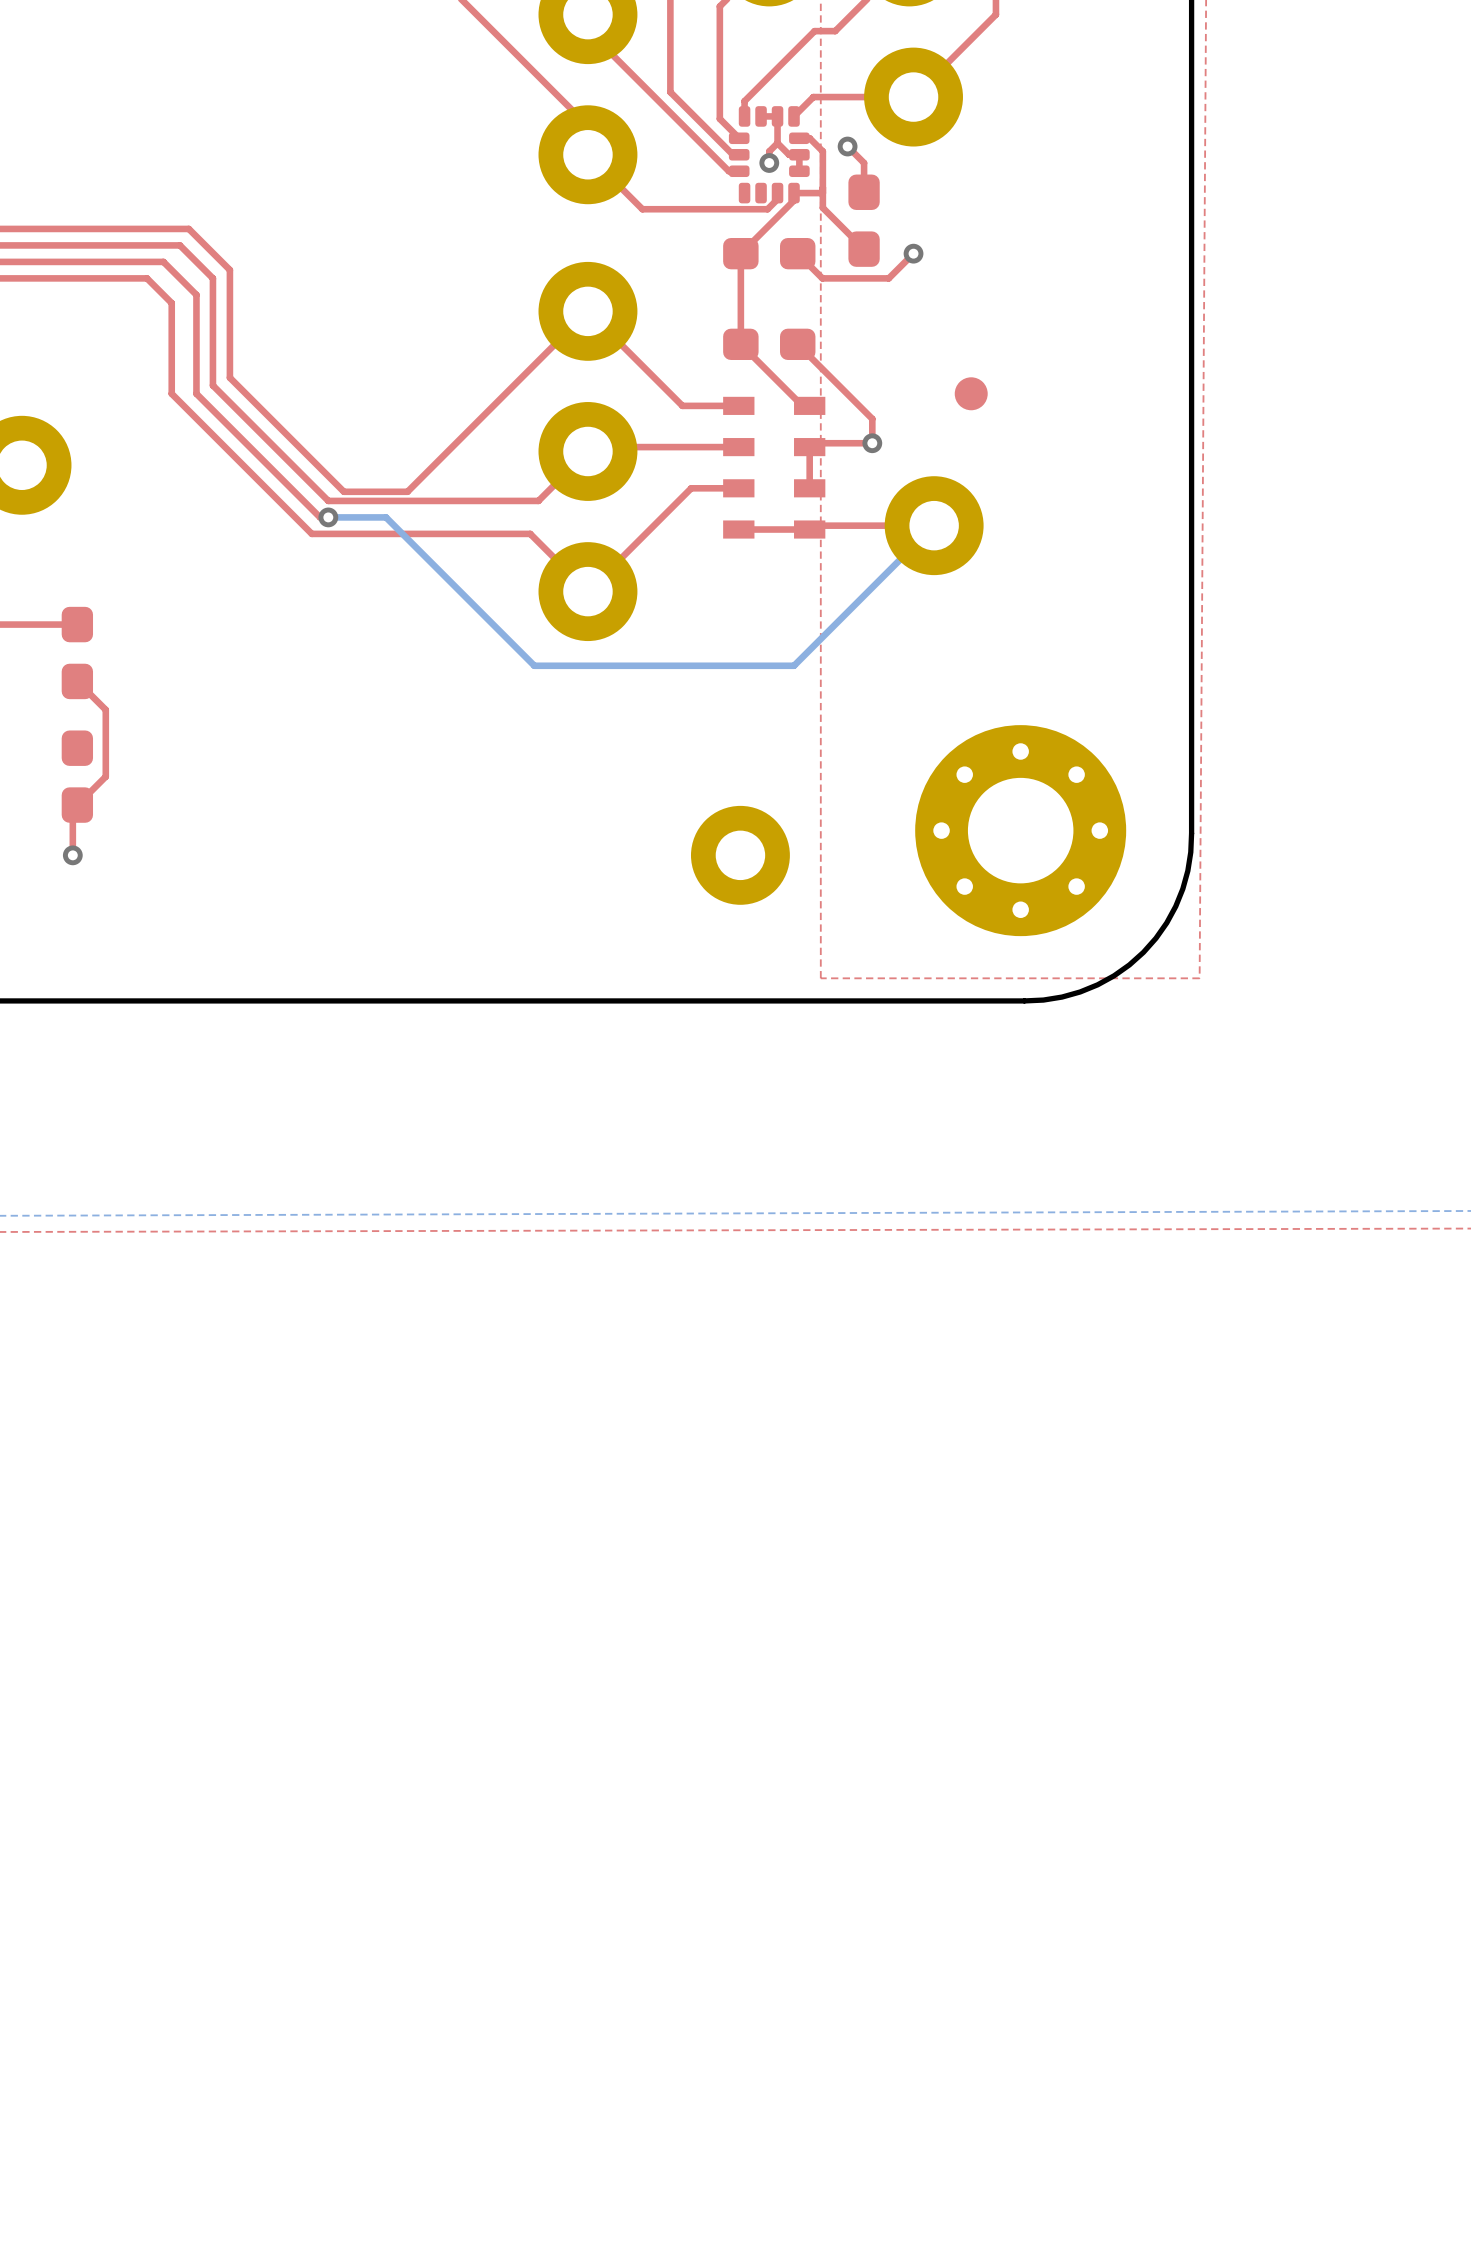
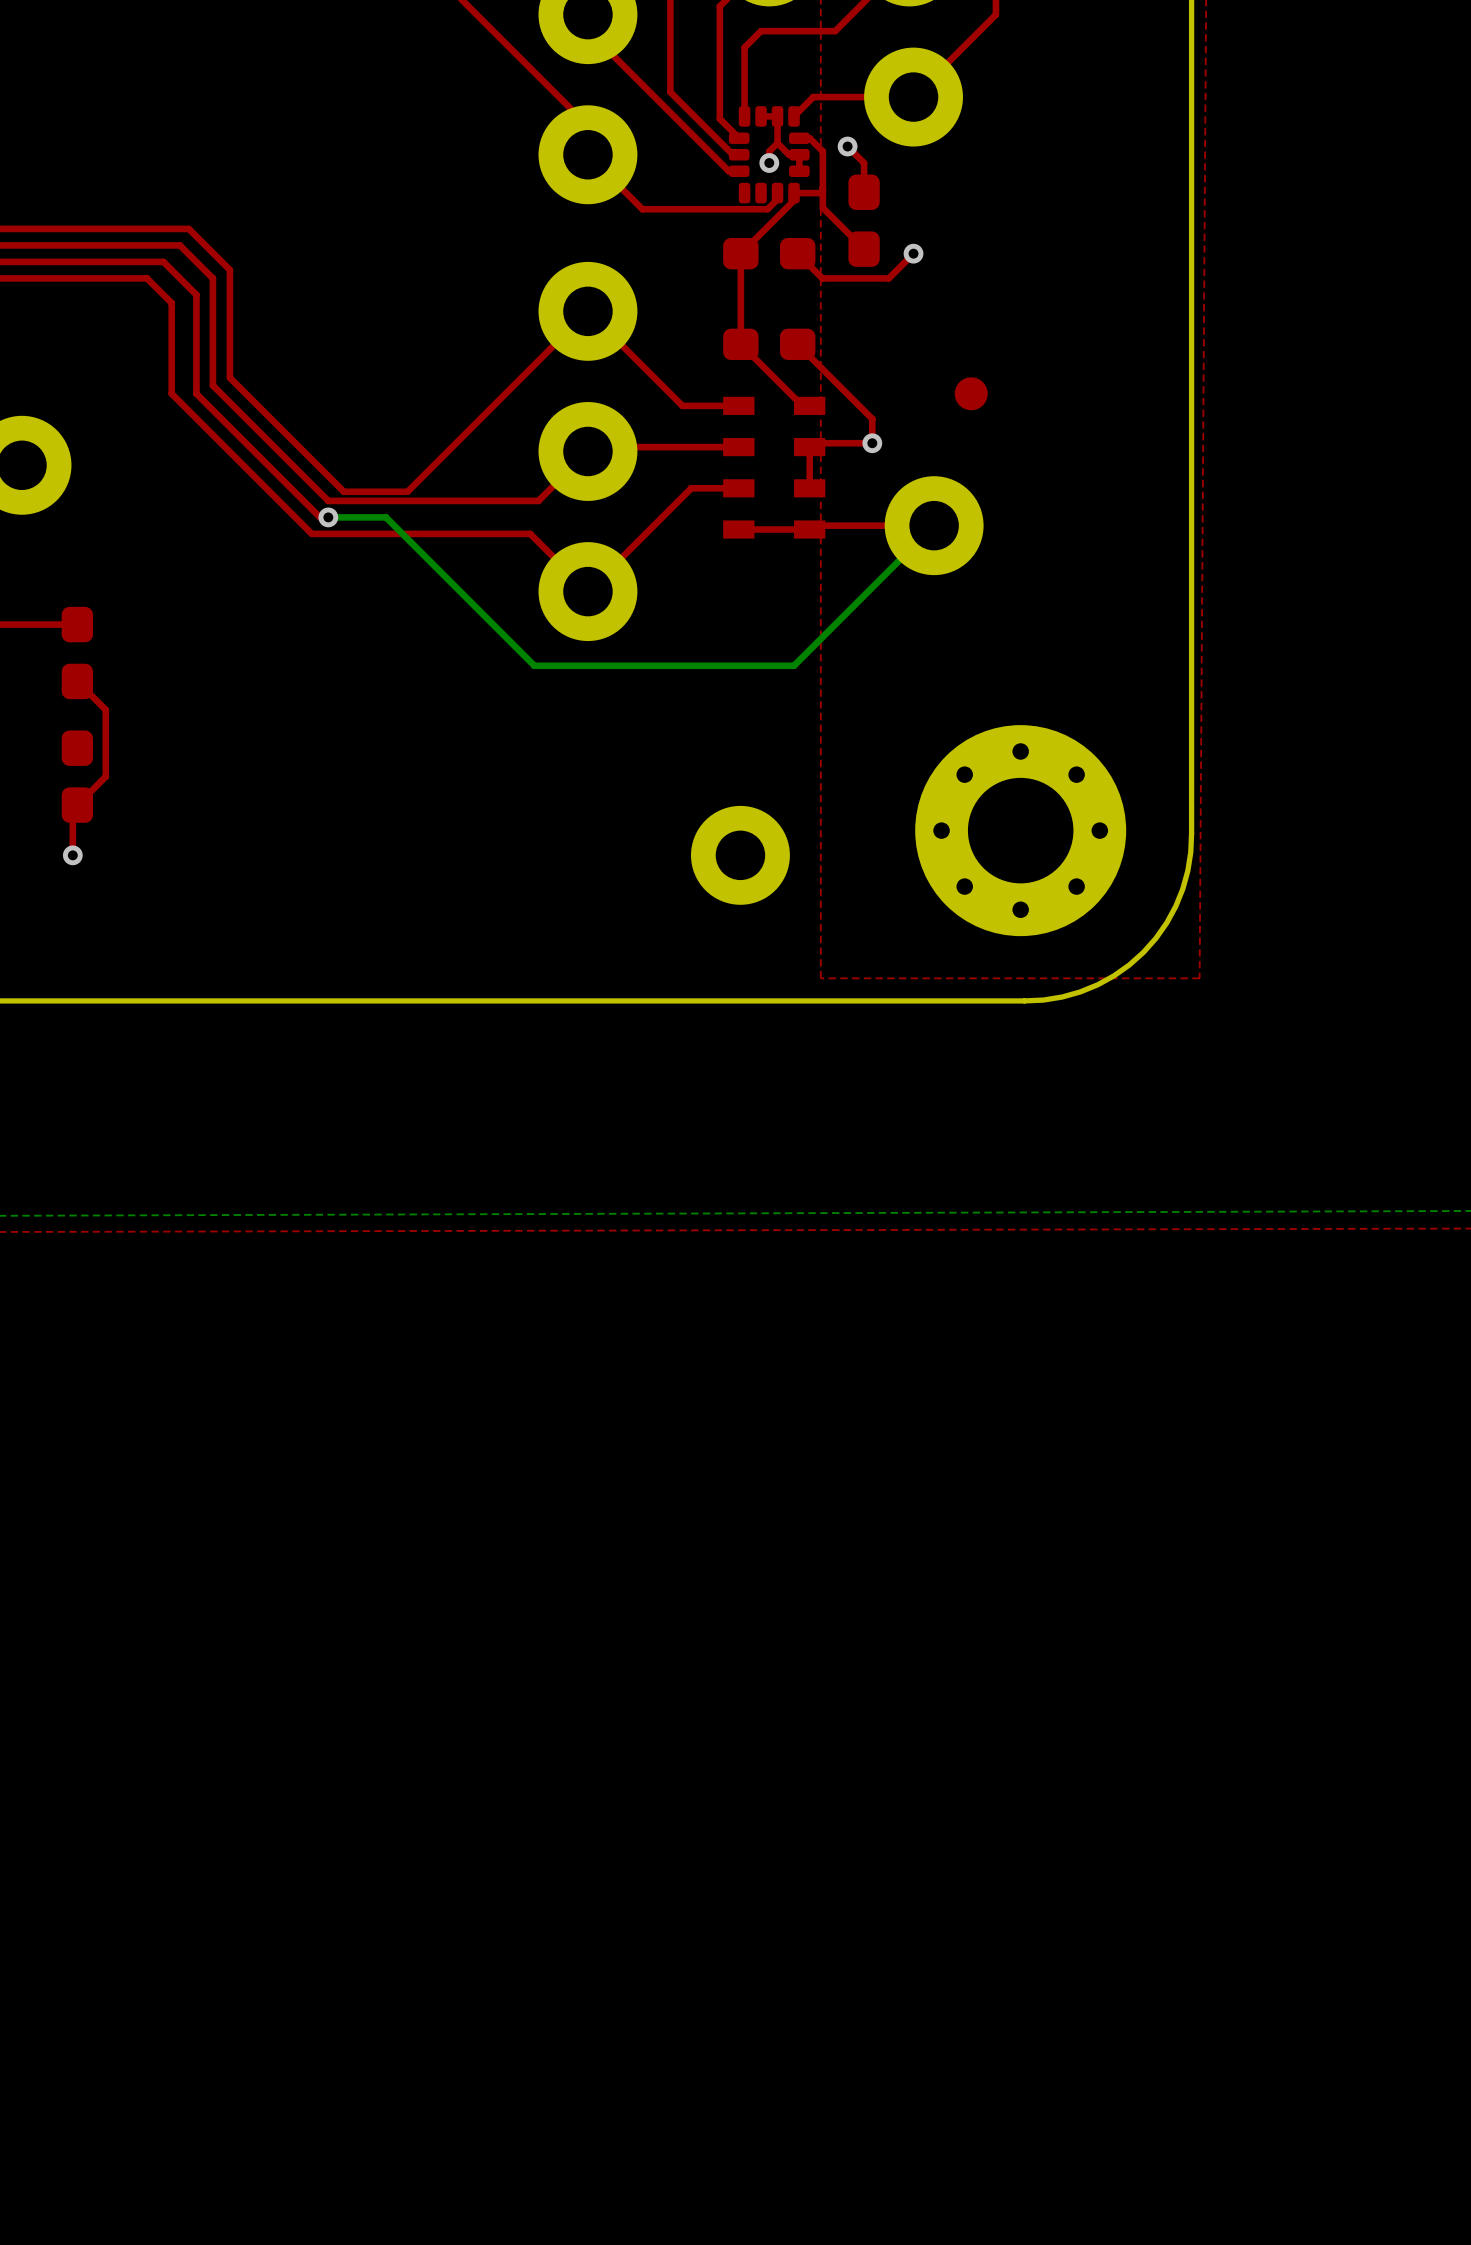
top track: (814, 31) (744, 101) -> (814, 31) (761, 31) (744, 47) (744, 101)

